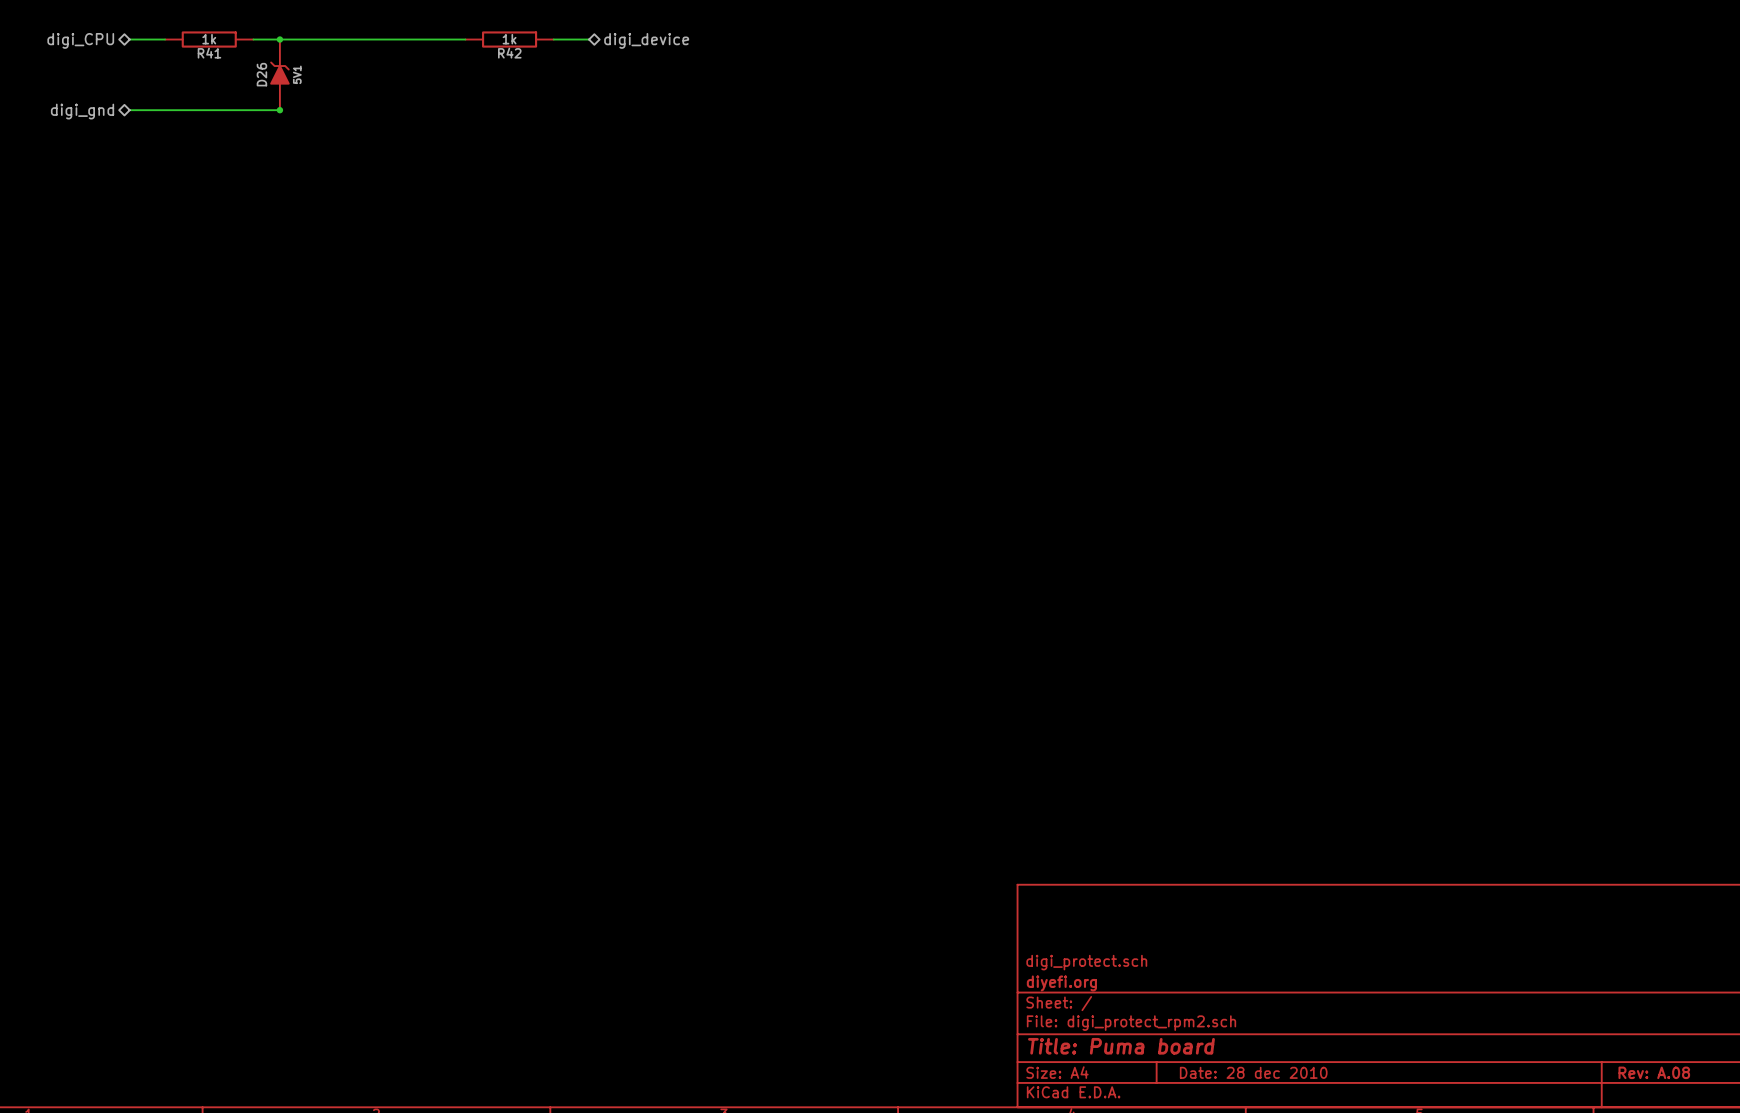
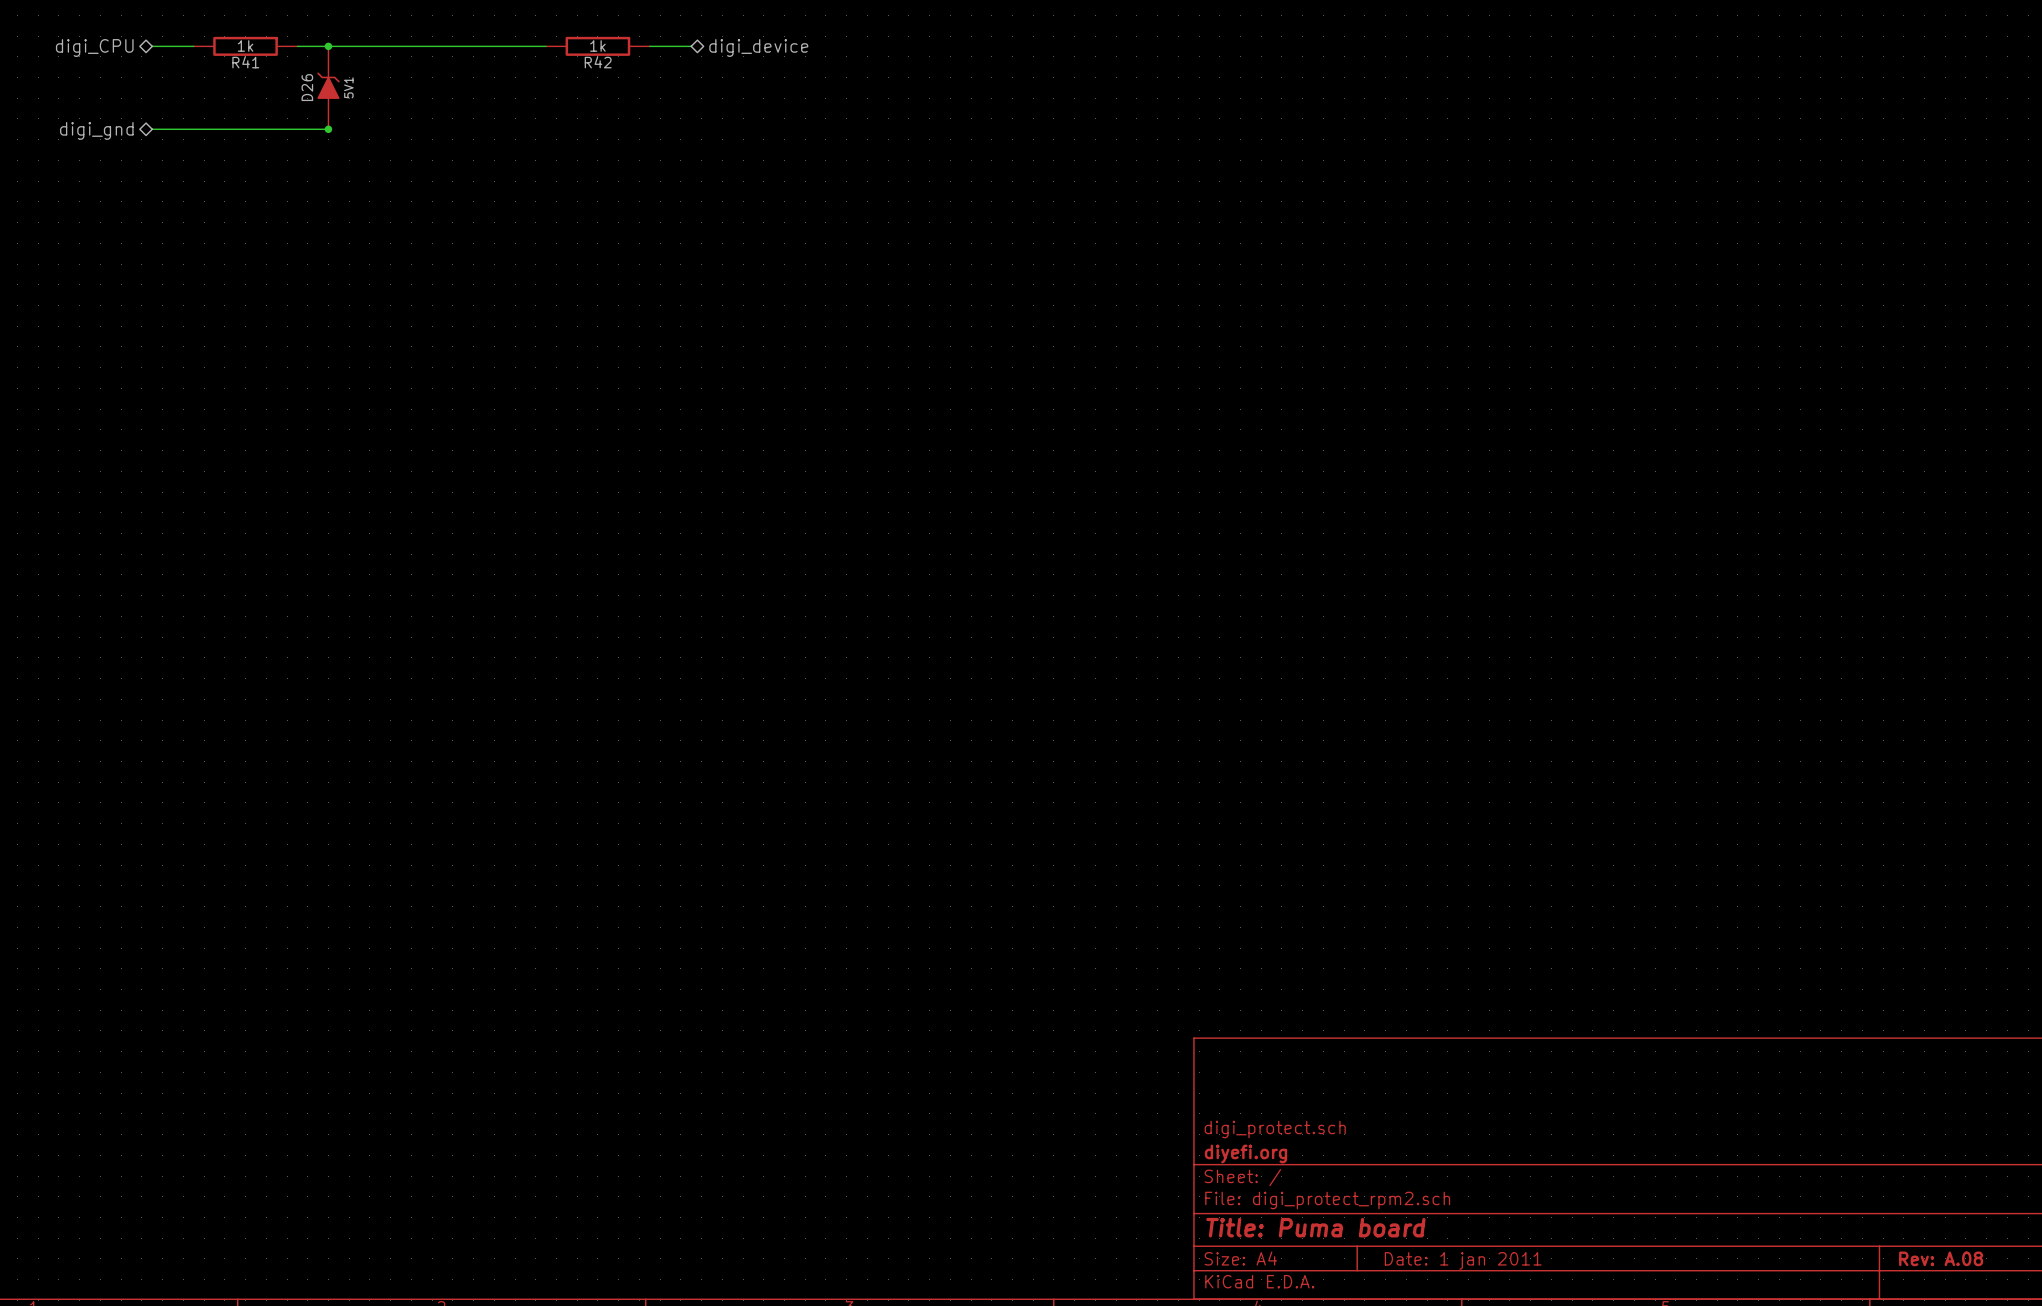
title block: Date: 28 dec 2010 (1253, 1072) -> Date: 1 jan 2011 (1463, 1260)

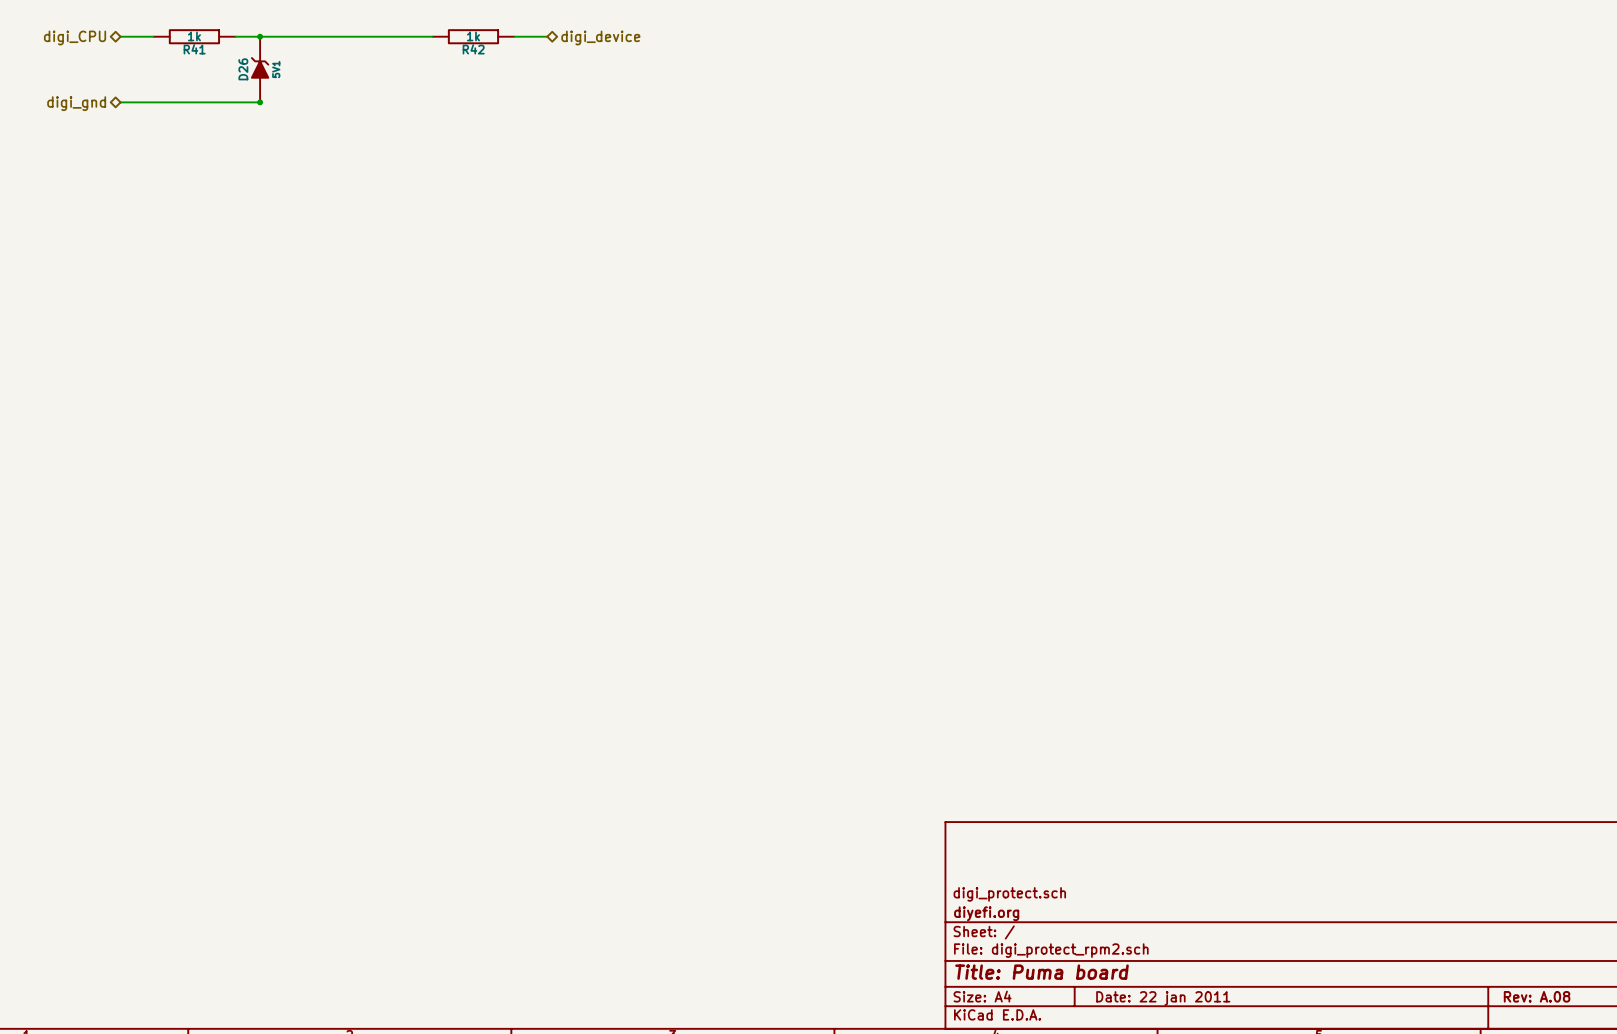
title block: Date: 1 jan 2011 (1463, 1260) -> Date: 22 jan 2011 (1163, 998)

